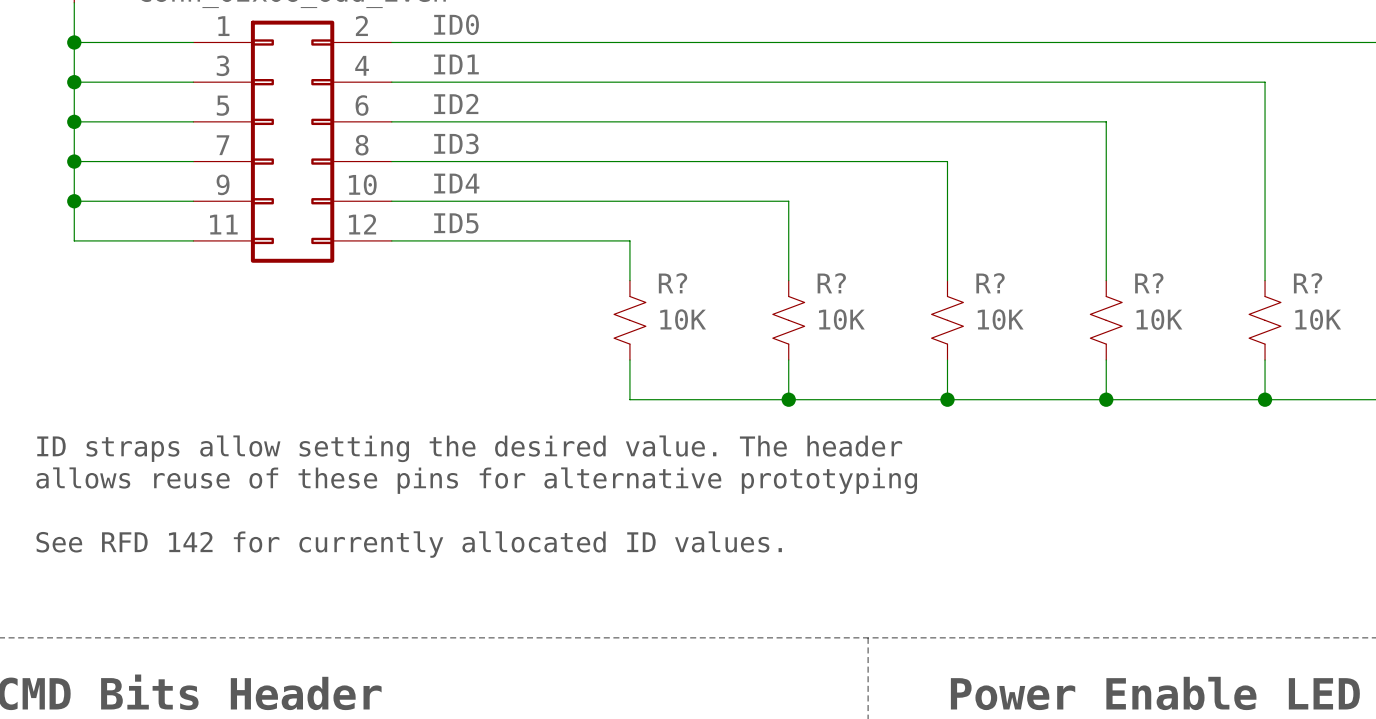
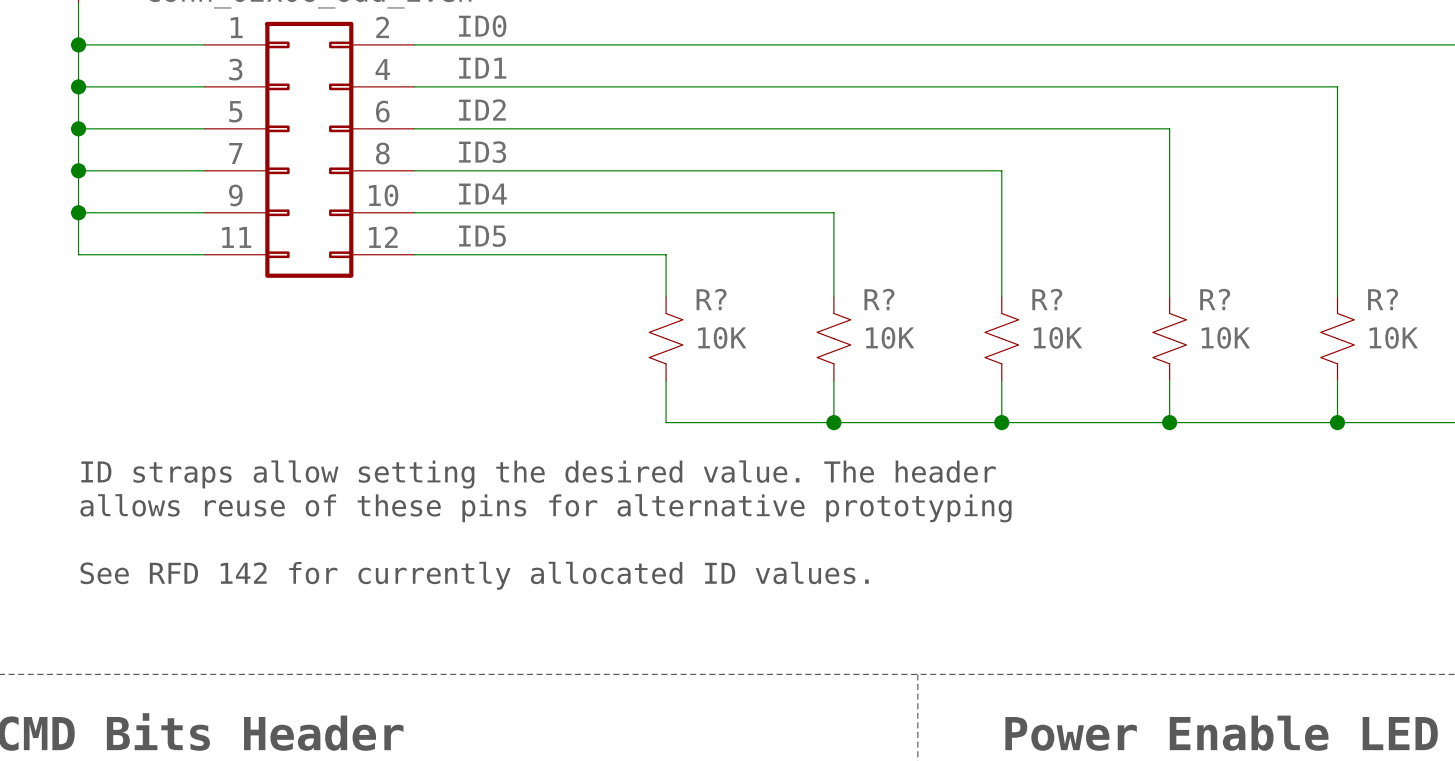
text position: ID straps allow setting the desired value. The header (469, 448) -> ID straps allow setting the desired value. The header (538, 474)
text position: allows reuse of these pins for alternative prototyping (476, 480) -> allows reuse of these pins for alternative prototyping (545, 508)
text position: See RFD 142 for currently allocated ID values. (409, 544) -> See RFD 142 for currently allocated ID values. (474, 575)

